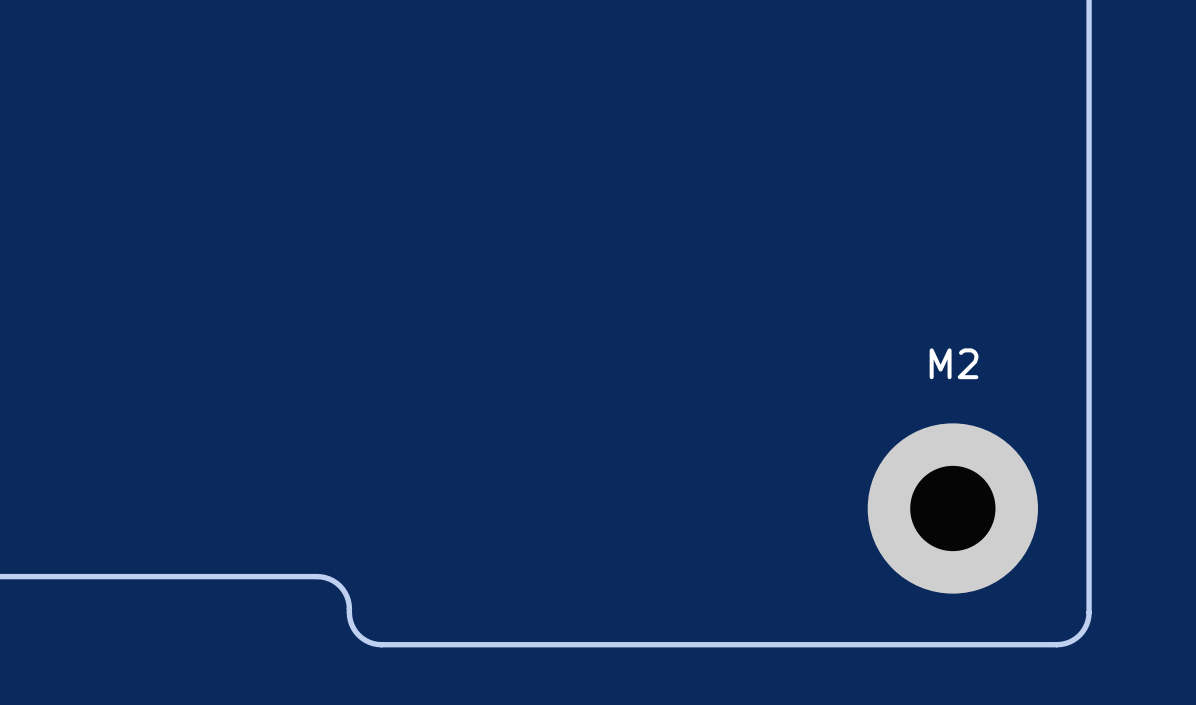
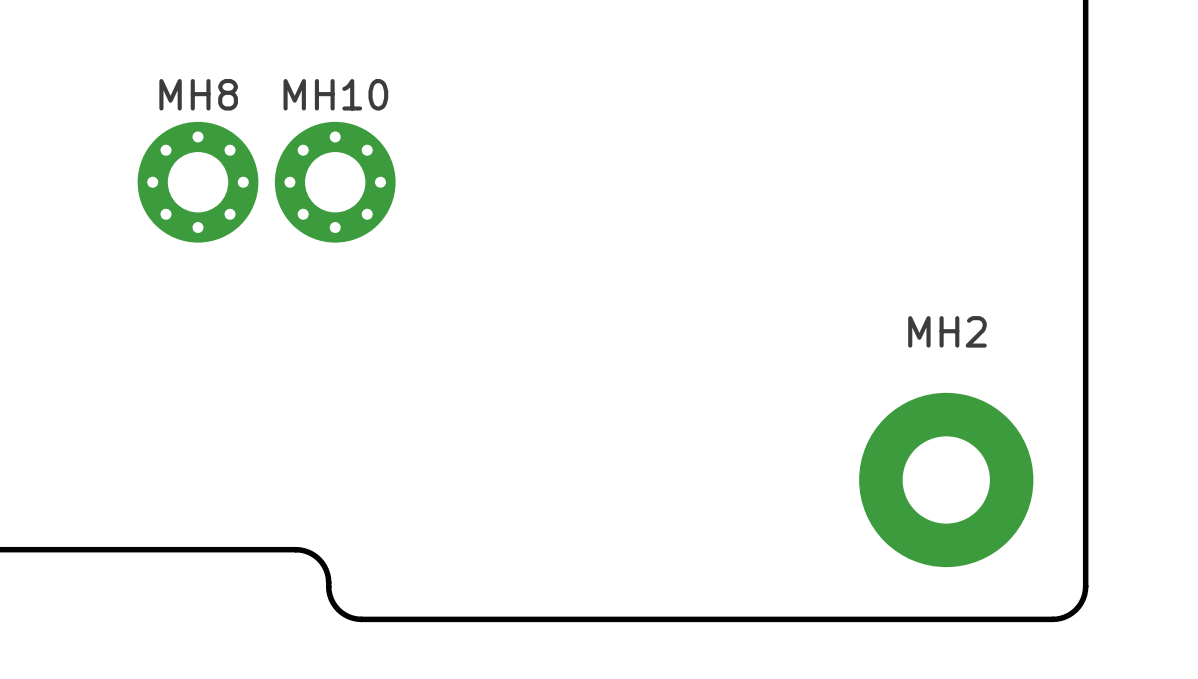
MH8: none -> (198, 182)
MH10: none -> (335, 182)
M2 name: M2 (954, 363) -> MH2 (947, 331)

